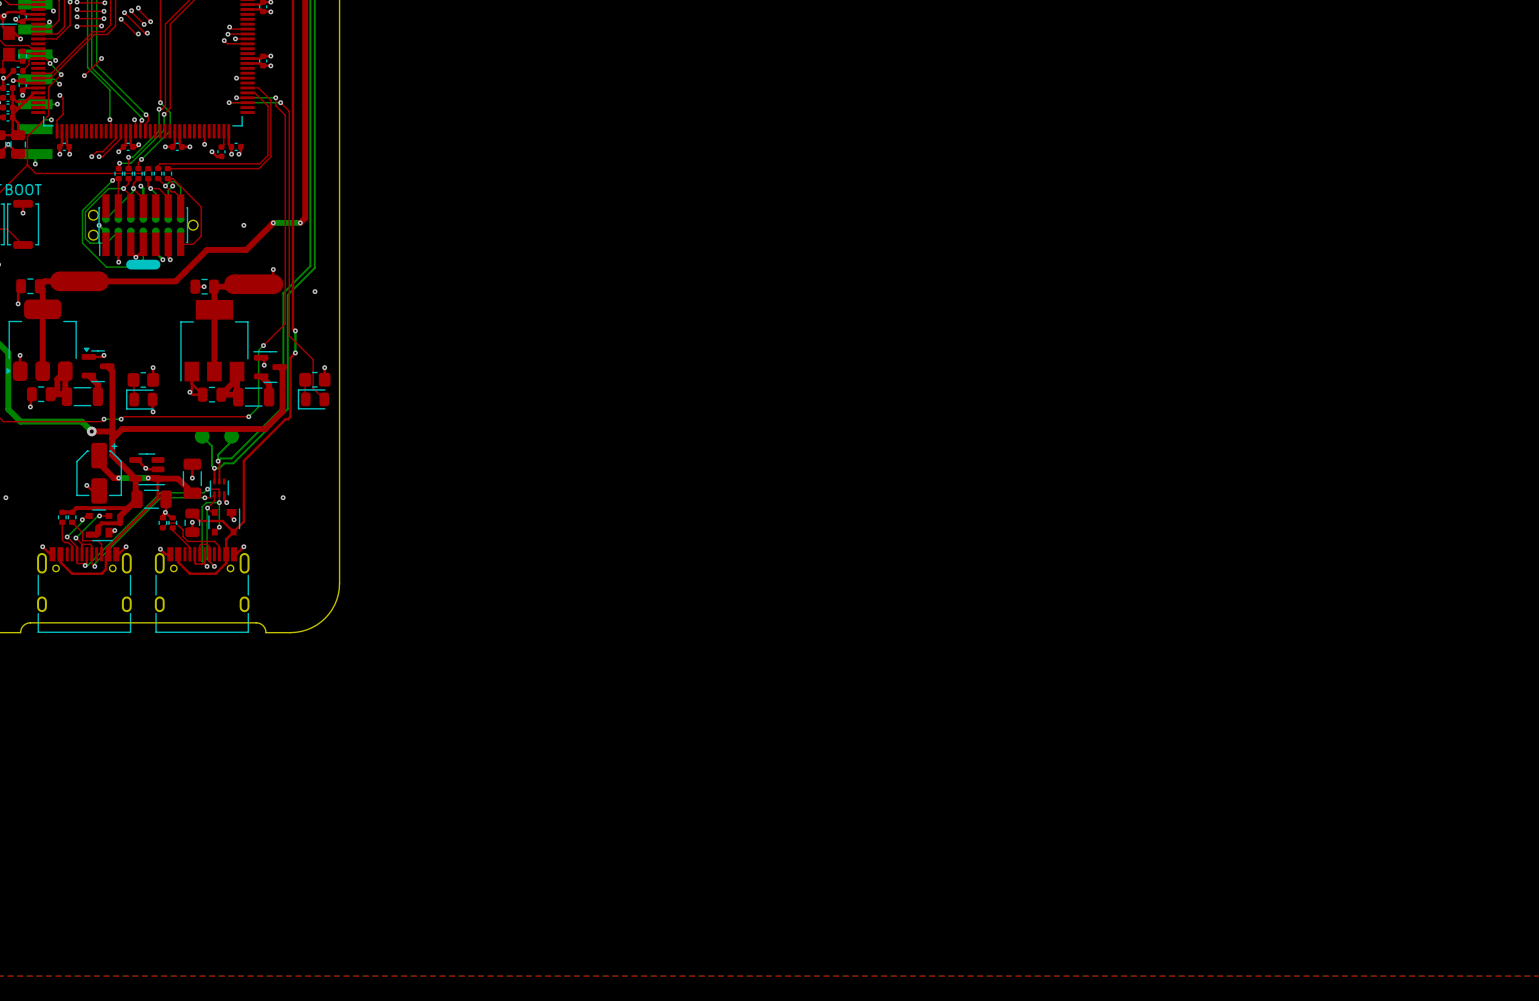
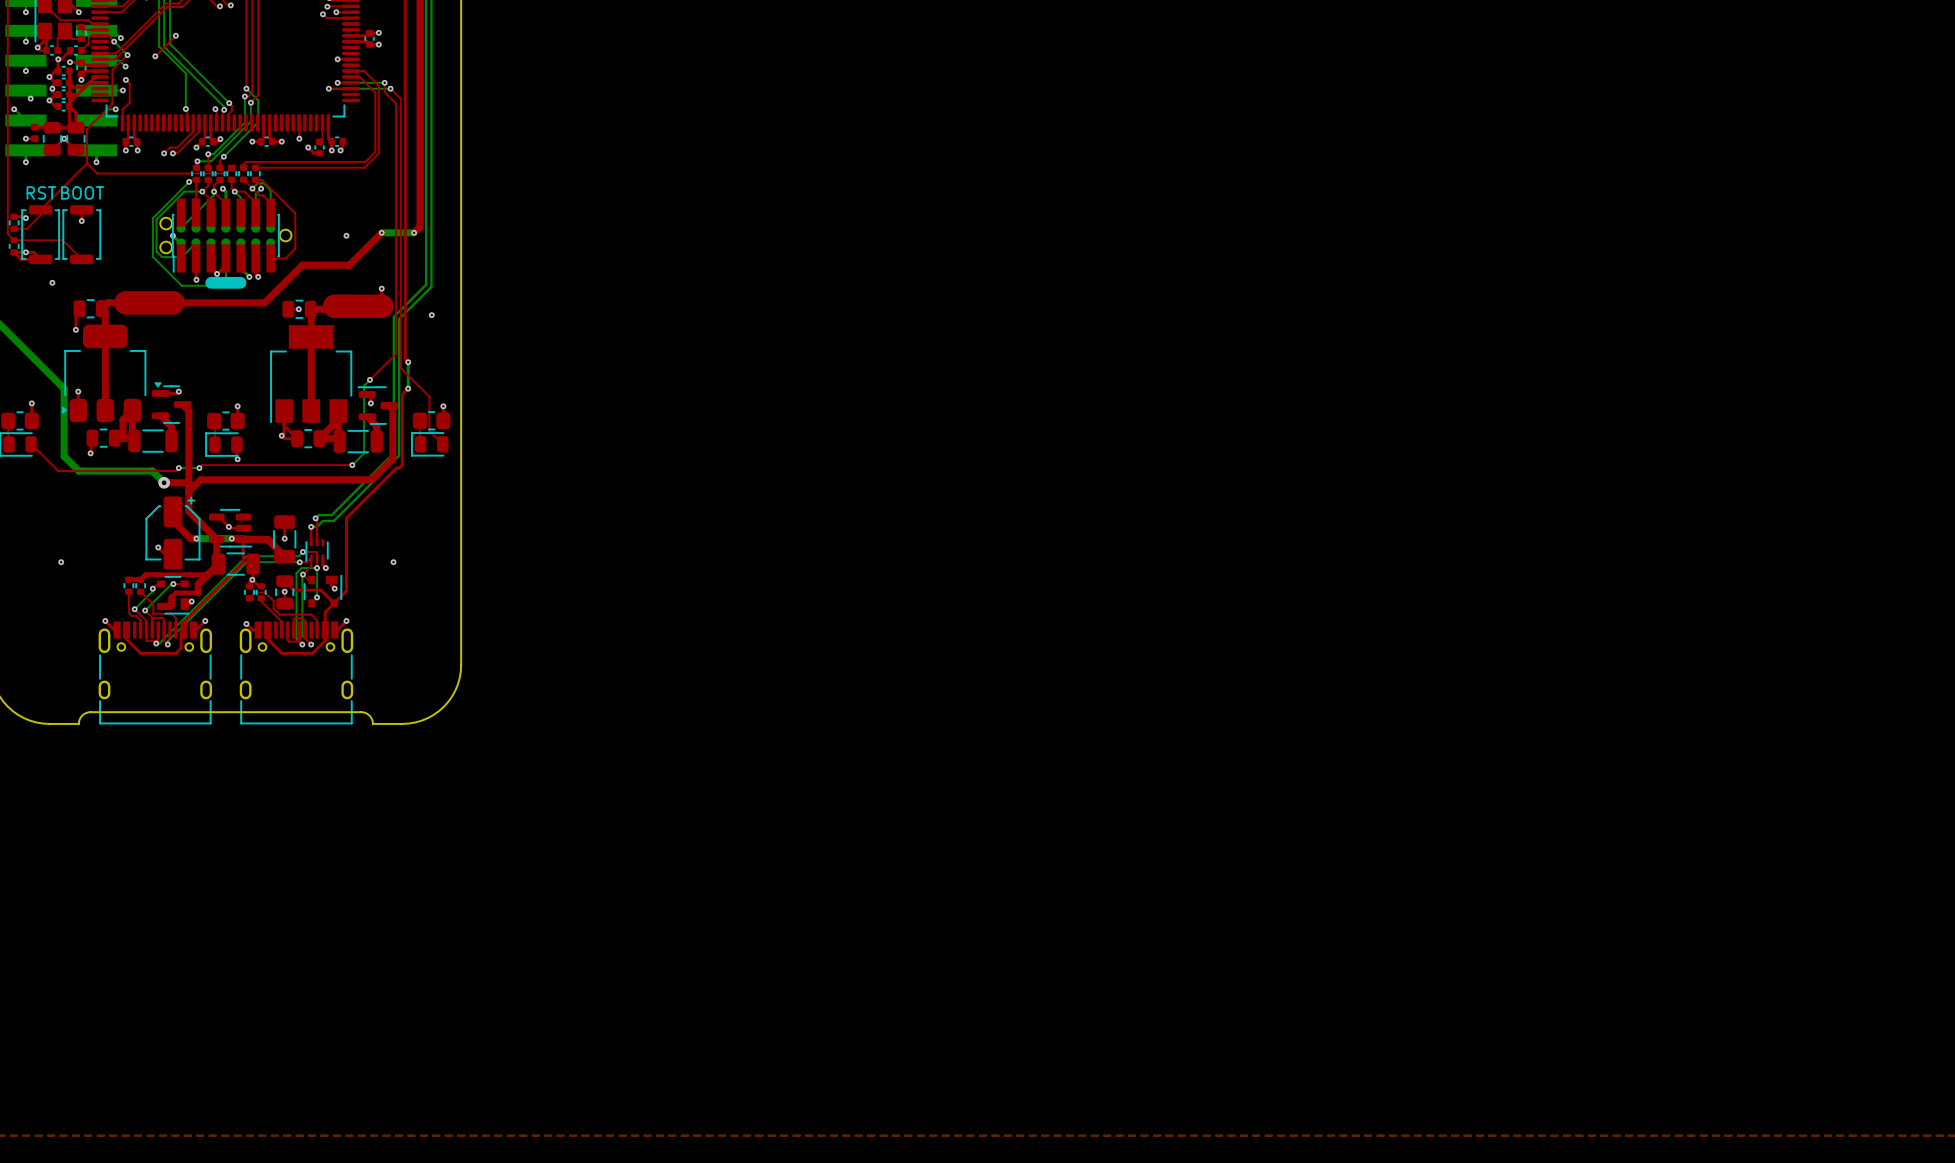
bottom track: (202, 436) (211, 446) (211, 465) (214, 468) -> none
part: (202, 436) -> none
bottom track: (231, 436) (229, 438) (229, 443) (218, 454) (218, 461) -> none
part: (231, 436) -> none

